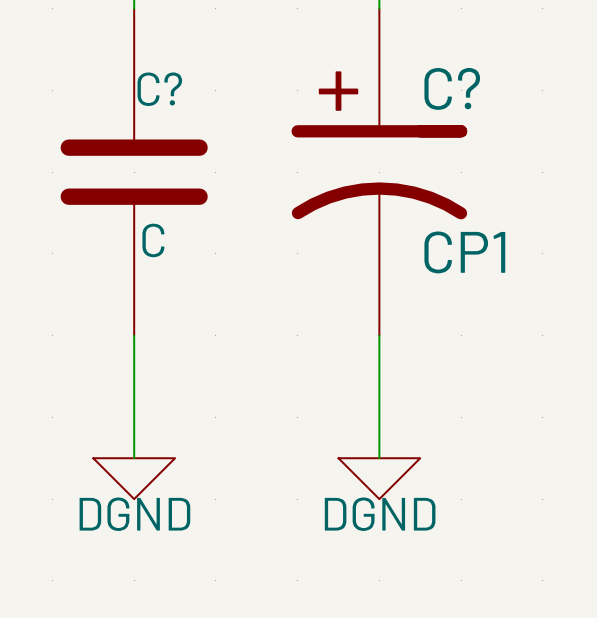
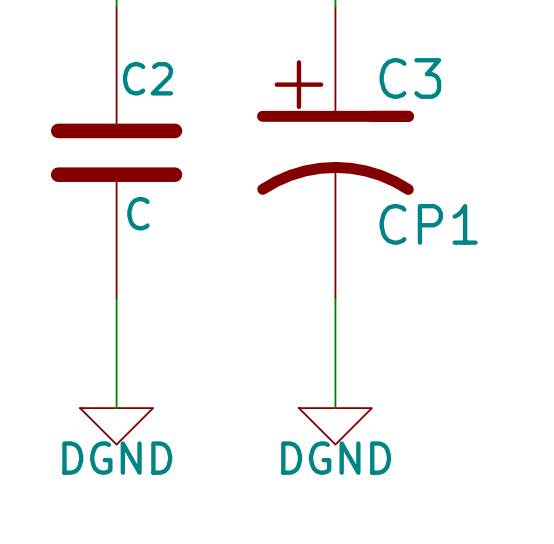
C? name: C? (452, 88) -> C3 (410, 78)
C? name: C? (159, 89) -> C2 (147, 78)

